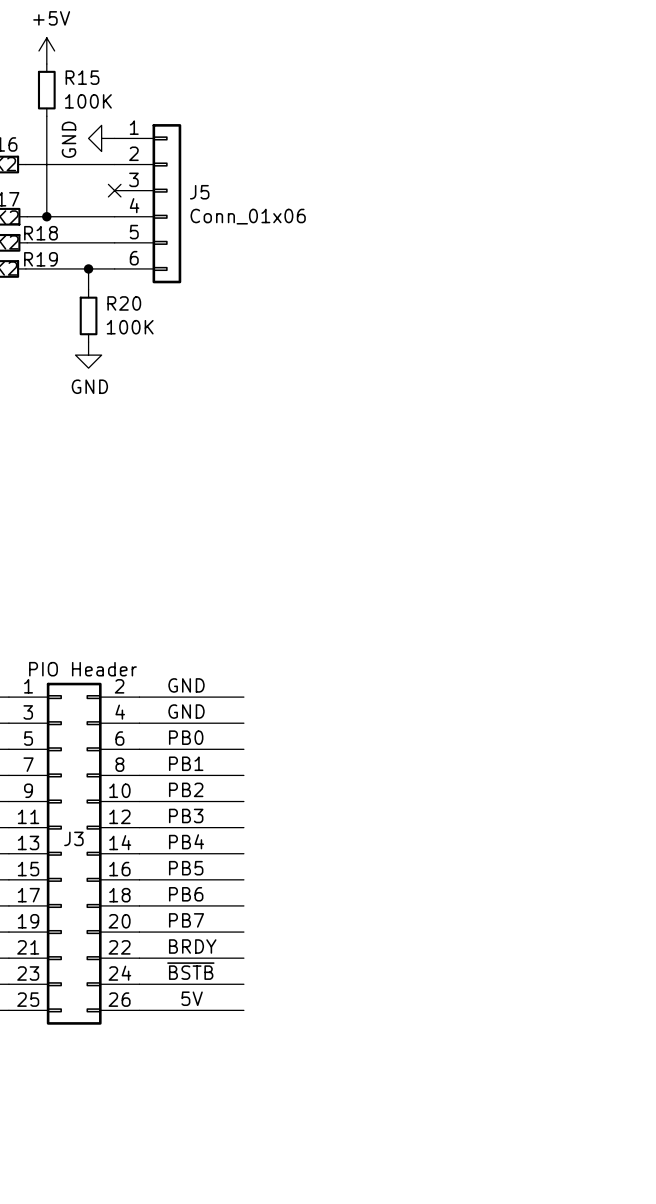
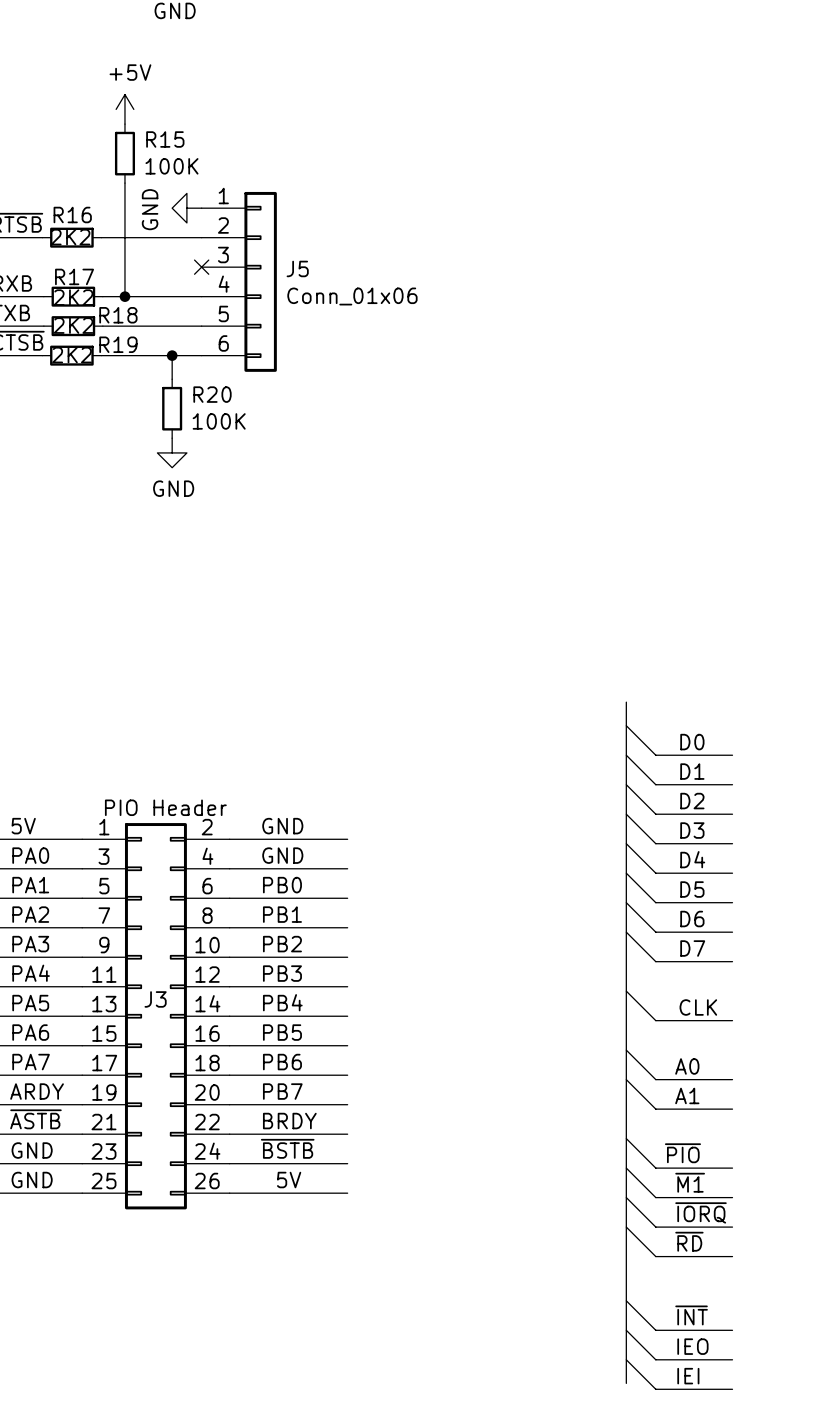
bus: none -> (626, 702) (626, 1383)
wire: none -> (626, 725) (655, 755) (732, 755)
label: none -> D0 (692, 742)
wire: none -> (626, 755) (655, 784) (732, 784)
label: none -> D1 (692, 771)
wire: none -> (626, 784) (655, 814) (732, 814)
label: none -> D2 (692, 801)
wire: none -> (626, 814) (655, 843) (732, 843)
label: none -> D3 (692, 830)
wire: none -> (626, 843) (655, 873) (732, 873)
label: none -> D4 (692, 859)
wire: none -> (626, 873) (655, 902) (732, 902)
label: none -> D5 (692, 889)
wire: none -> (626, 902) (655, 932) (732, 932)
label: none -> D6 (692, 919)
wire: none -> (626, 932) (655, 961) (732, 961)
label: none -> D7 (692, 948)
wire: none -> (626, 991) (655, 1020) (732, 1020)
label: none -> CLK (698, 1007)
wire: none -> (626, 1050) (655, 1079) (732, 1079)
label: none -> A0 (687, 1066)
wire: none -> (626, 1079) (655, 1109) (732, 1109)
label: none -> A1 (687, 1095)
wire: none -> (626, 1138) (655, 1168) (732, 1168)
label: none -> ~{PIO} (682, 1153)
wire: none -> (626, 1168) (655, 1197) (732, 1197)
label: none -> ~{M1} (690, 1182)
wire: none -> (626, 1197) (655, 1227) (732, 1227)
label: none -> ~{IORQ} (701, 1212)
wire: none -> (626, 1227) (655, 1256) (732, 1256)
label: none -> ~{RD} (689, 1241)
wire: none -> (626, 1300) (655, 1330) (732, 1330)
label: none -> ~{INT} (691, 1315)
wire: none -> (626, 1330) (655, 1359) (732, 1359)
label: none -> IEO (692, 1346)
wire: none -> (626, 1359) (655, 1389) (732, 1389)
label: none -> IEI (688, 1376)

